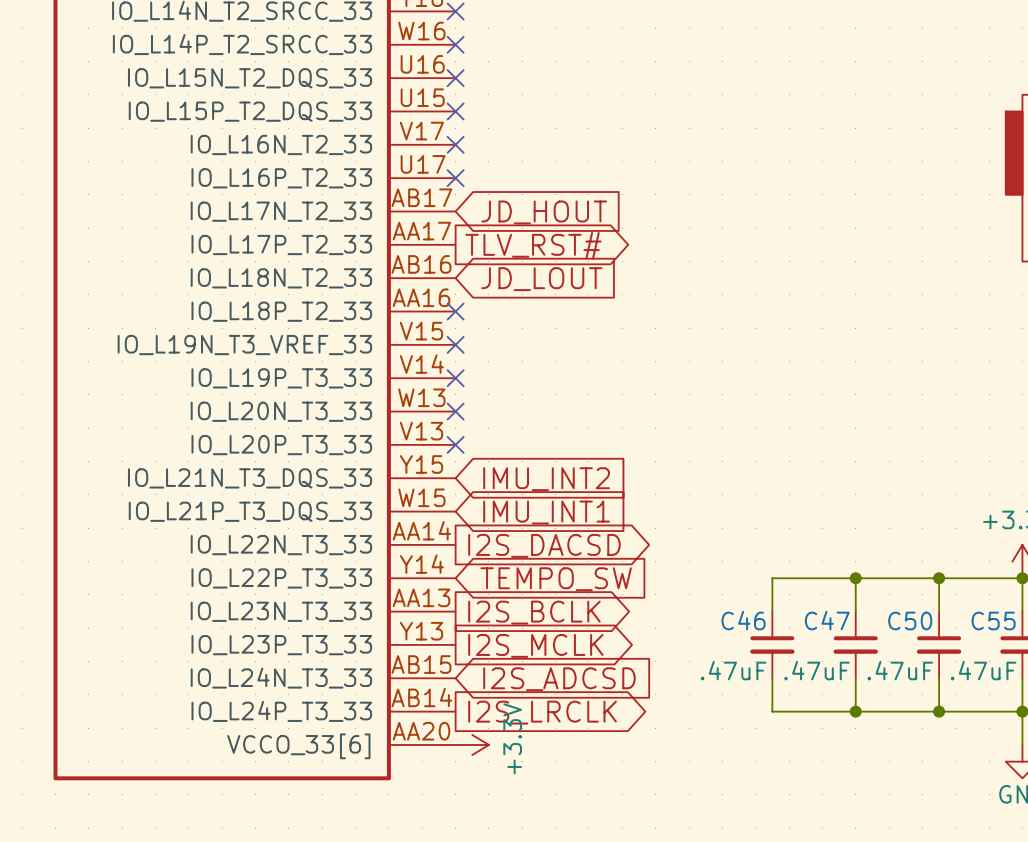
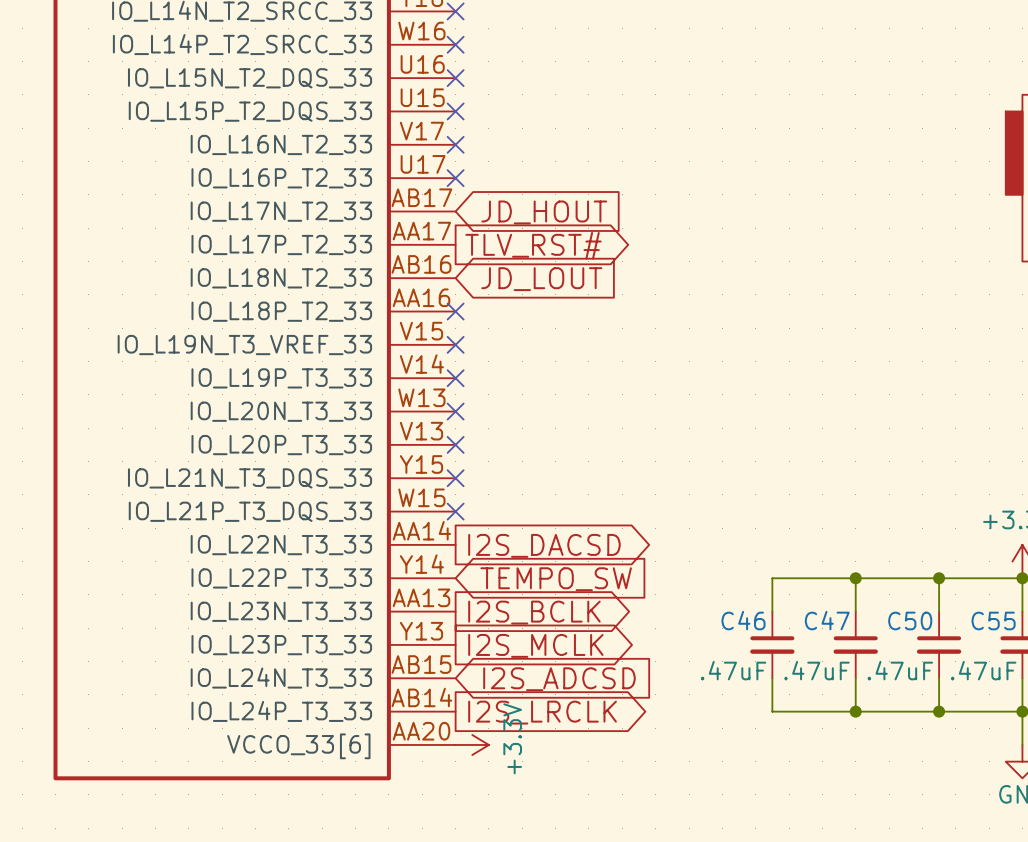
no-connect mark: none -> (455, 478)
global label: IMU_INT2 (546, 479) -> none
no-connect mark: none -> (455, 511)
global label: IMU_INT1 (546, 512) -> none

